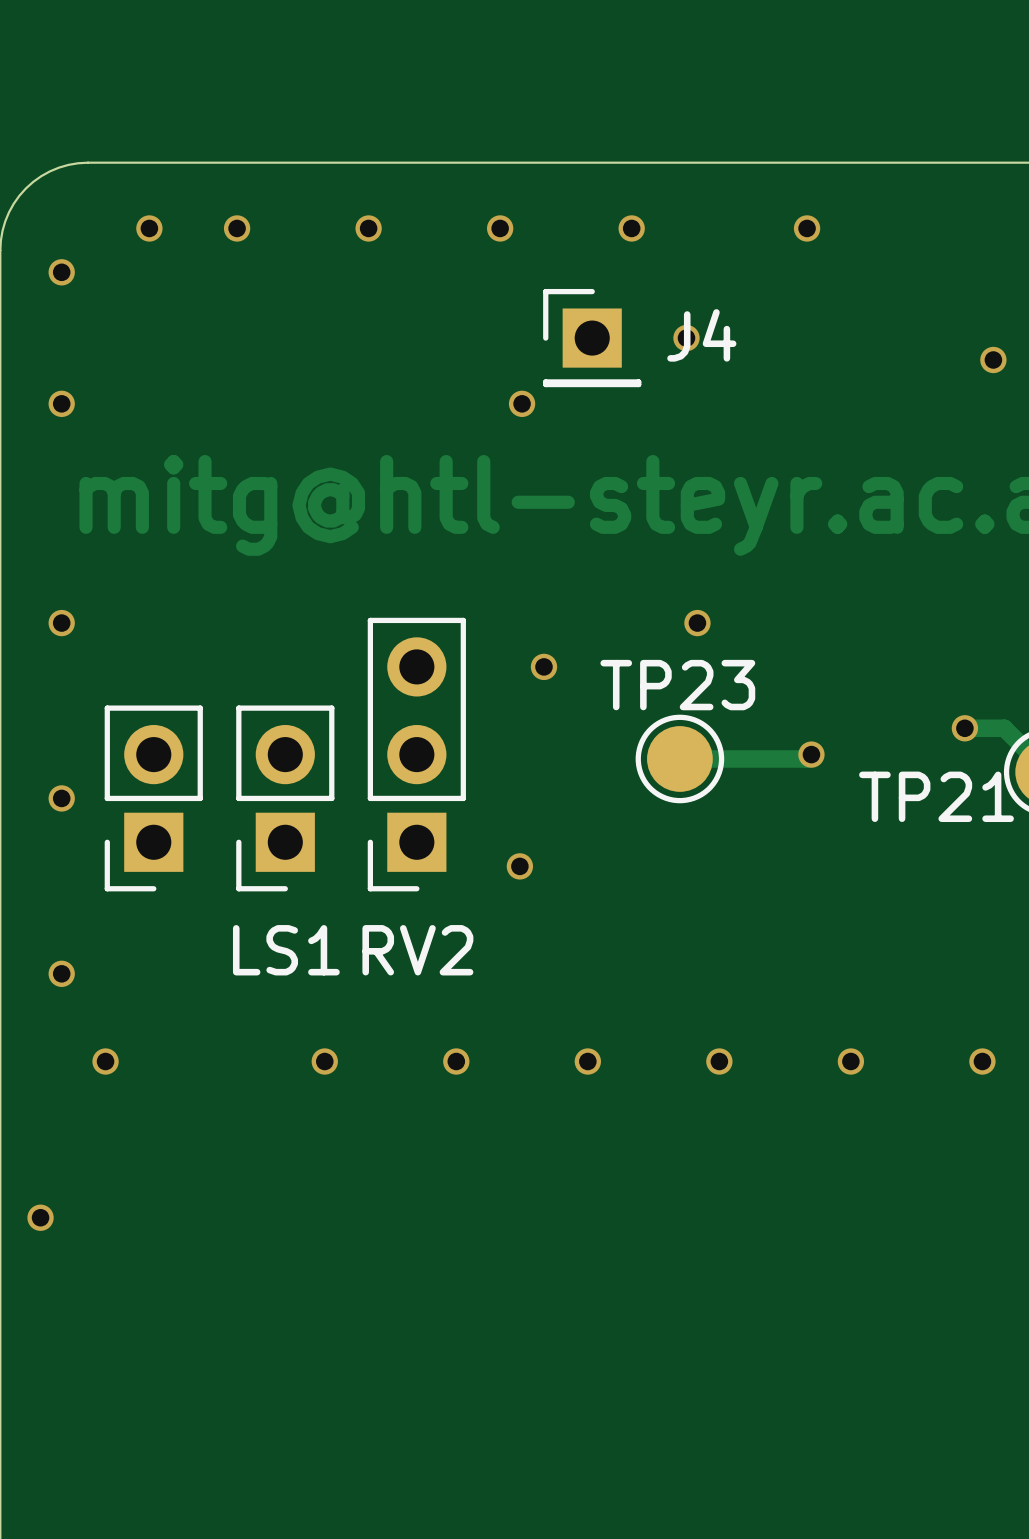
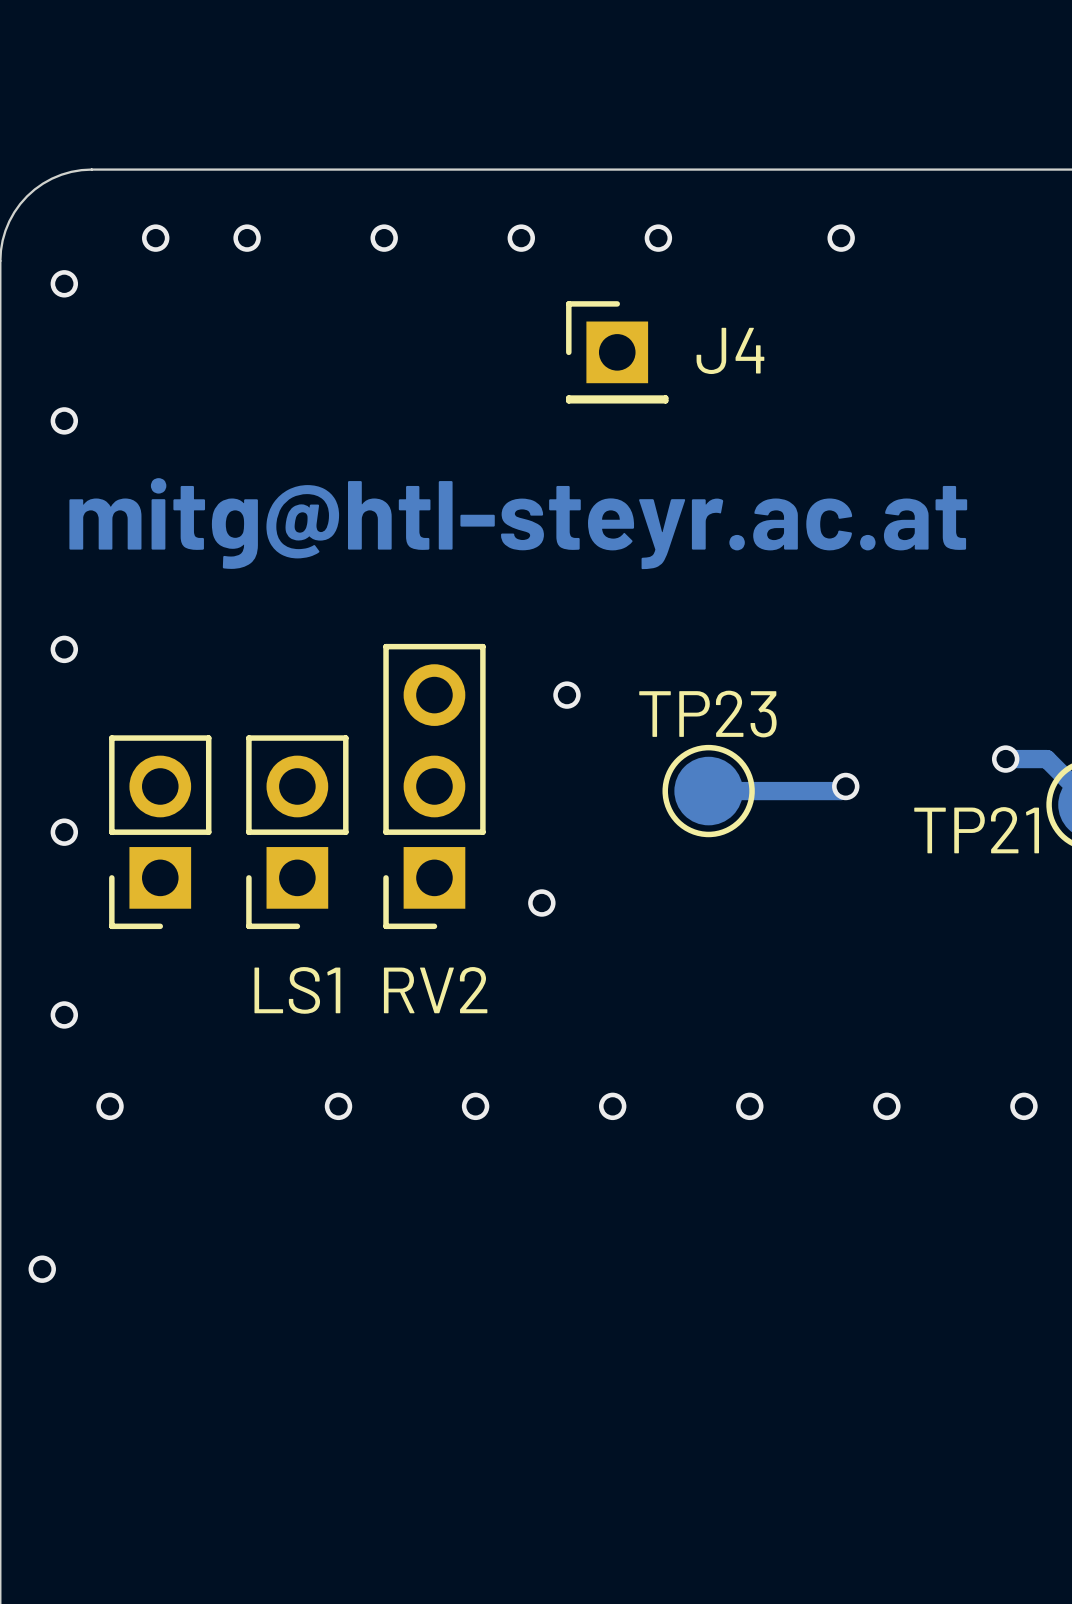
via: (686, 338) -> none
via: (993, 359) -> none
via: (522, 403) -> none
via: (697, 623) -> none

